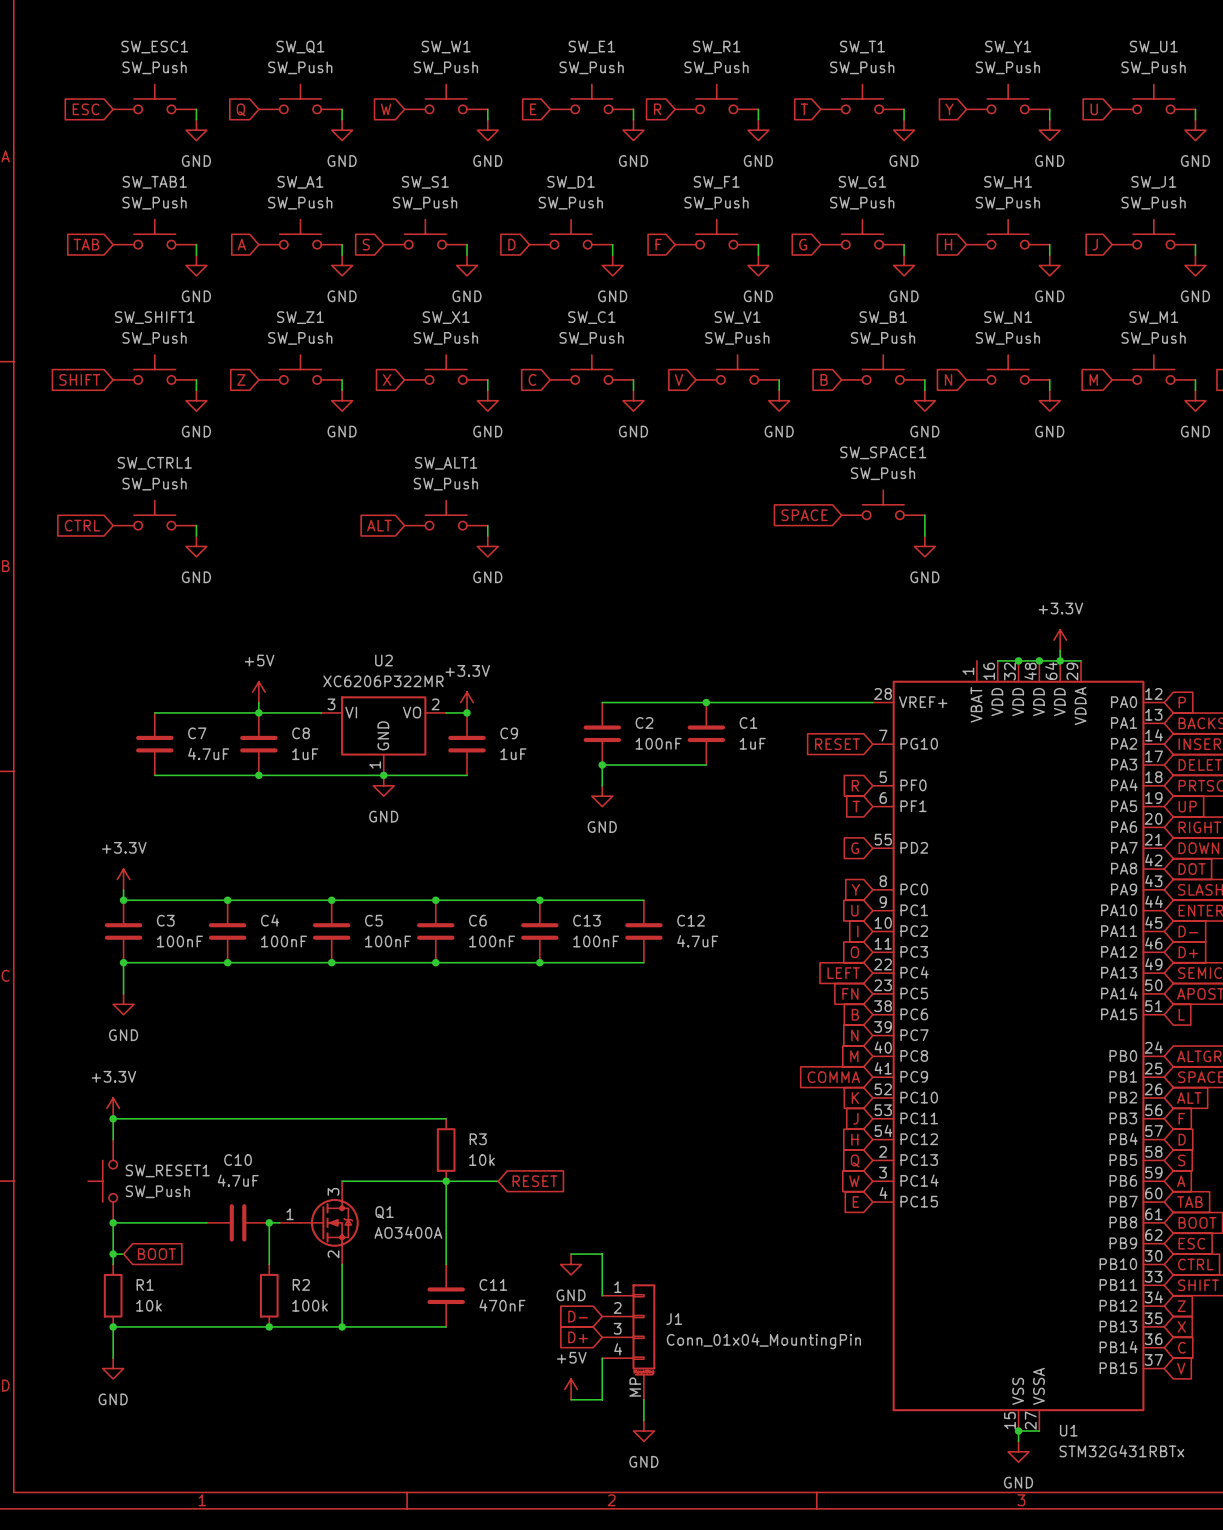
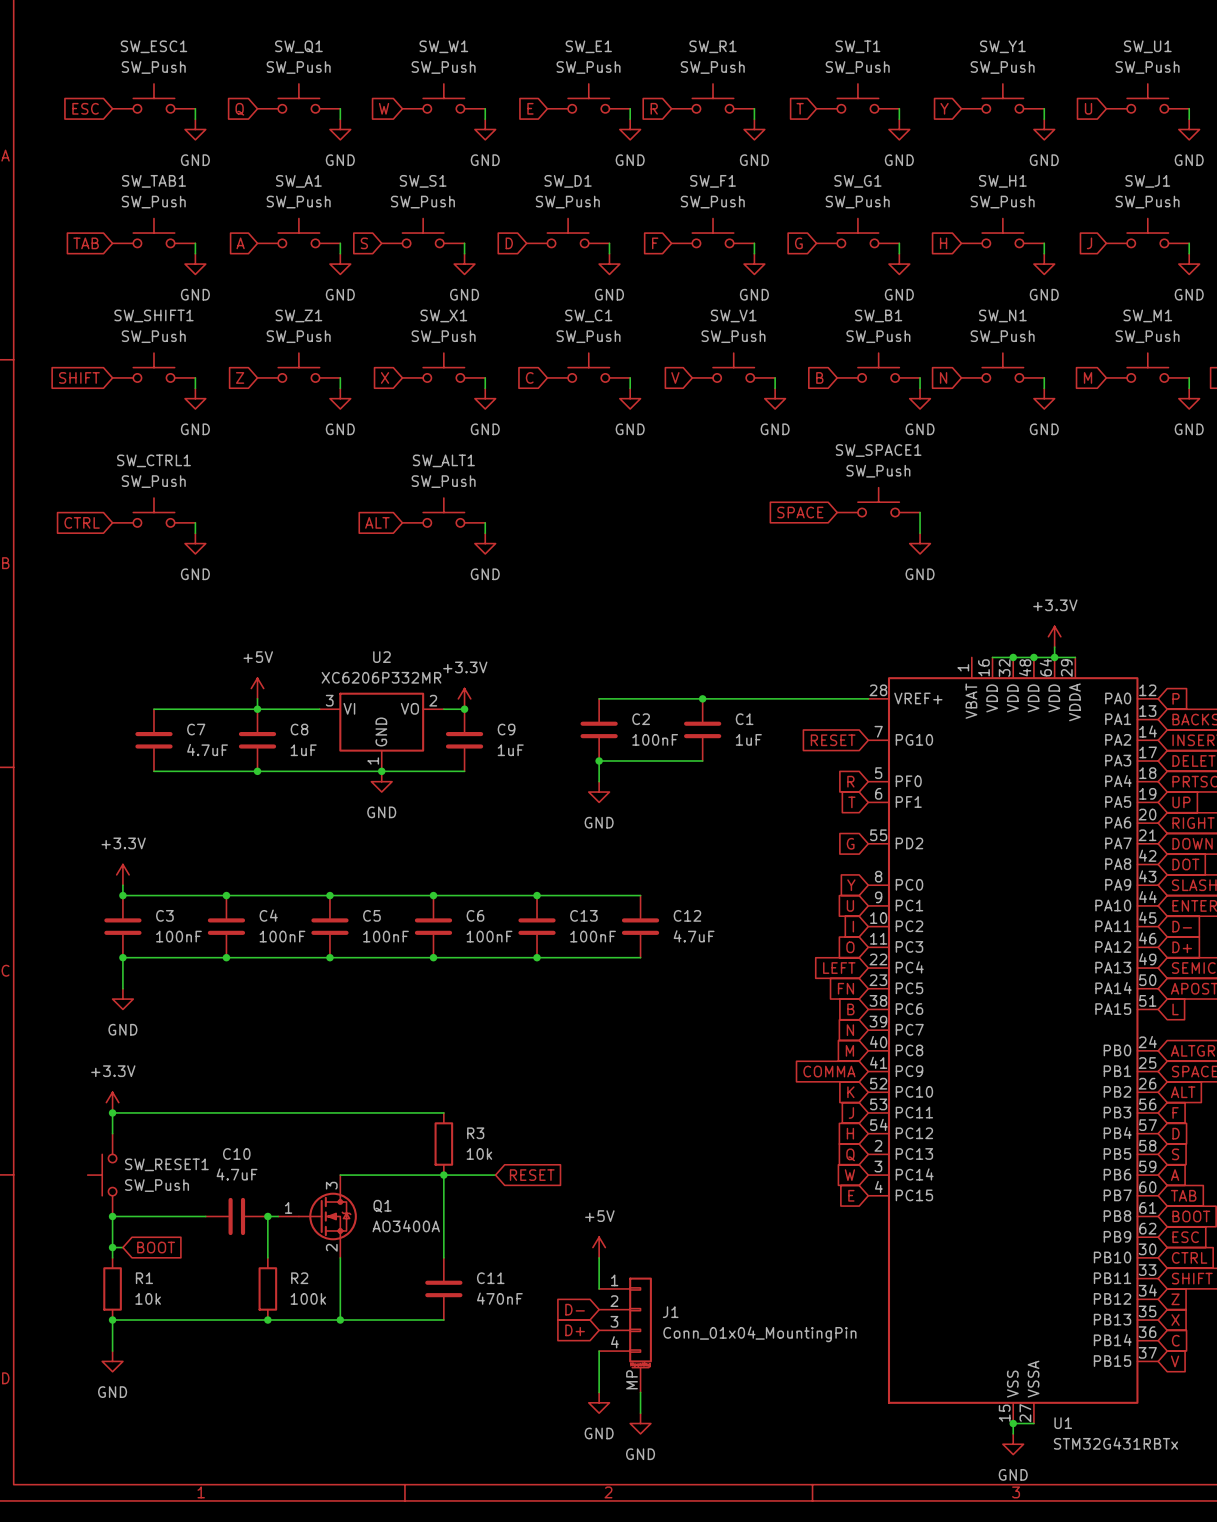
U2 value: XC6206P322MR (383, 681) -> XC6206P332MR (381, 677)
wire: (571, 1254) (602, 1254) (602, 1264) -> none
power symbol position: GND (571, 1264) -> GND (599, 1402)
power symbol position: +5V (571, 1389) -> +5V (599, 1247)
wire: (571, 1399) (602, 1399) -> none

